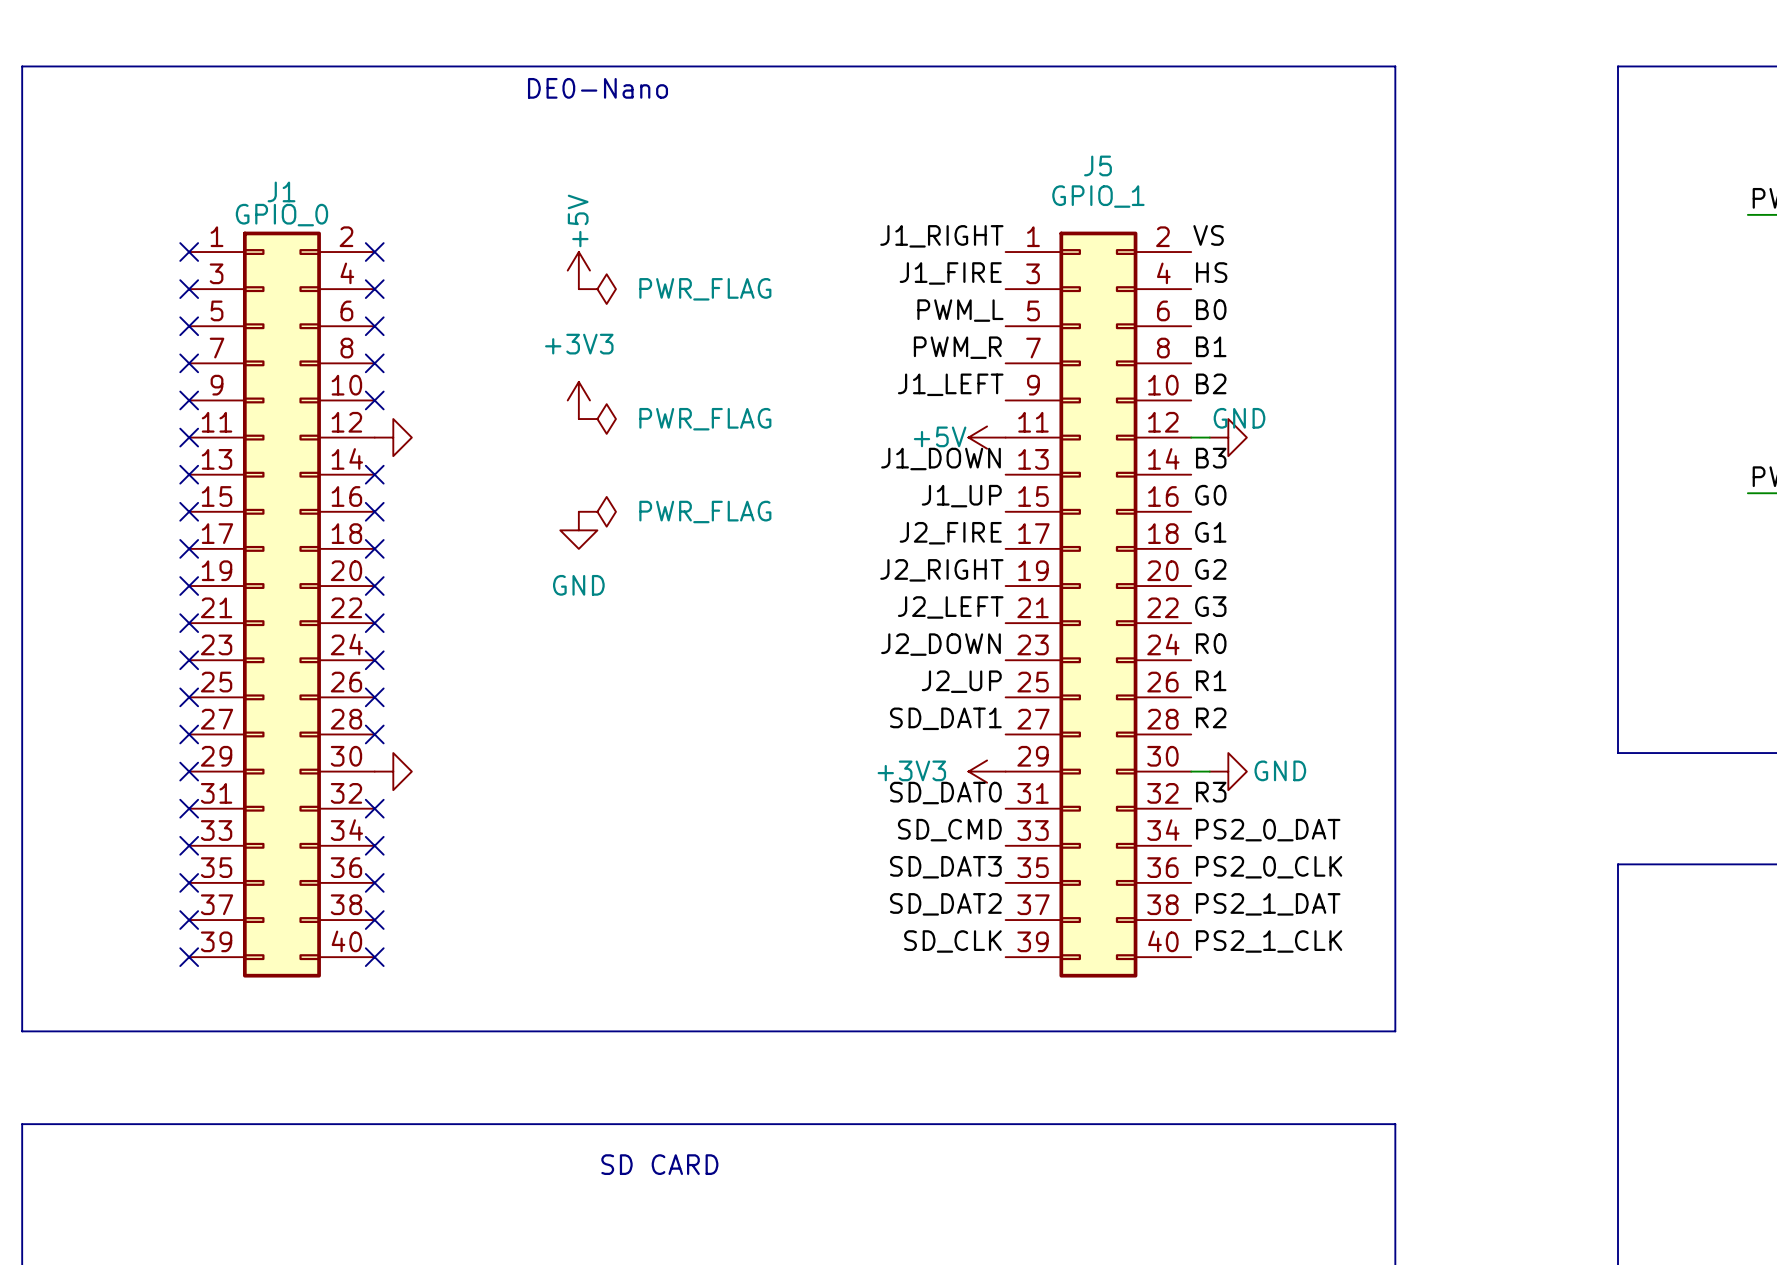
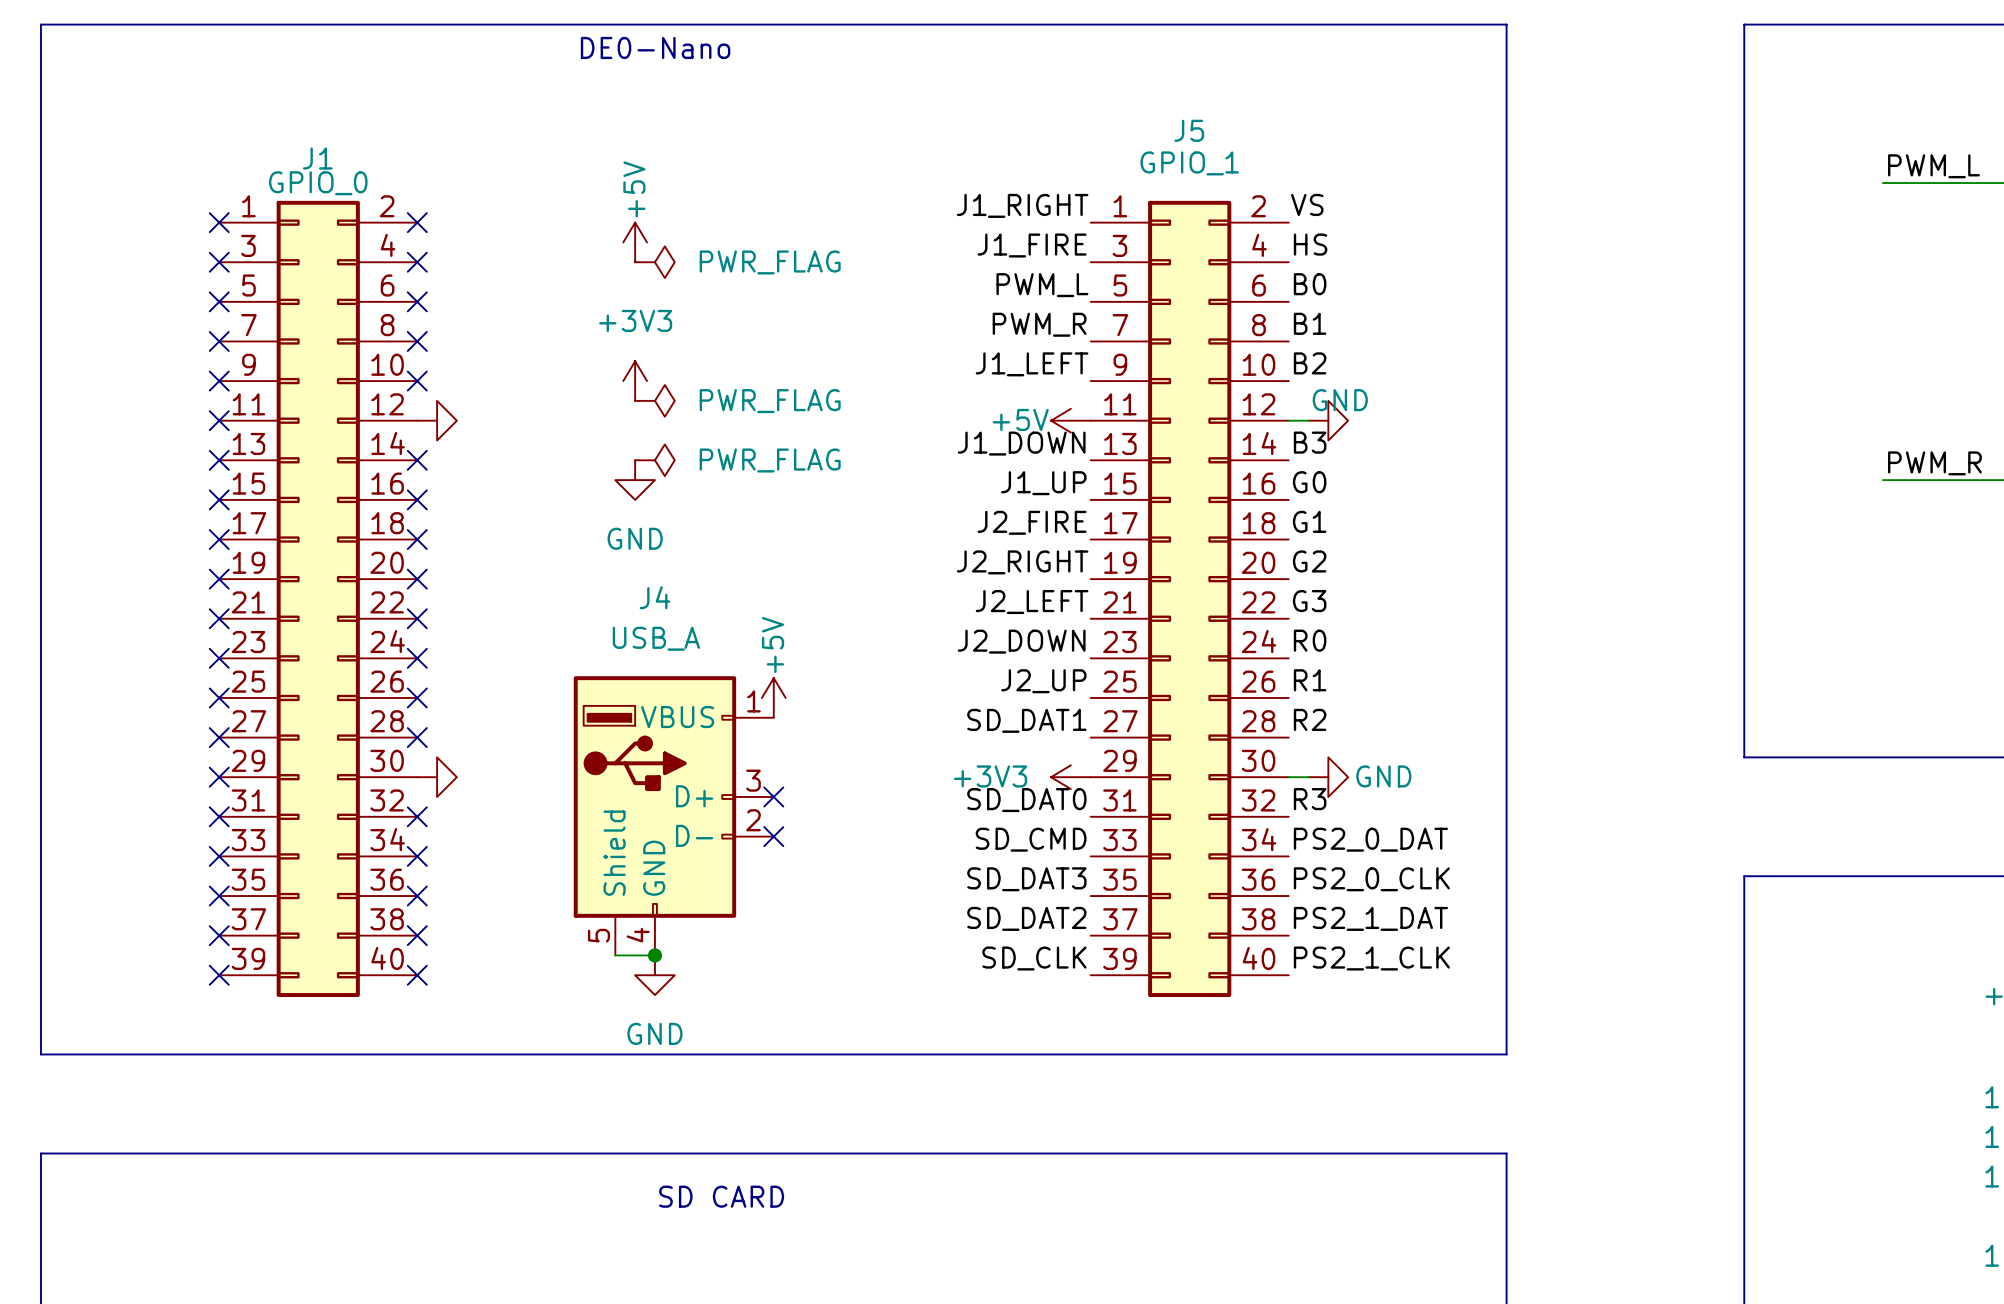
power symbol position: PWR_FLAG (597, 511) -> PWR_FLAG (654, 460)
power symbol position: GND (578, 530) -> GND (635, 480)
power symbol: none -> +5V (773, 697)
no-connect mark: none -> (773, 796)
J4: none -> USB_A (673, 815)
no-connect mark: none -> (773, 836)
wire: none -> (615, 955) (654, 955)
junction: none -> (654, 955)
power symbol: none -> GND (654, 975)

